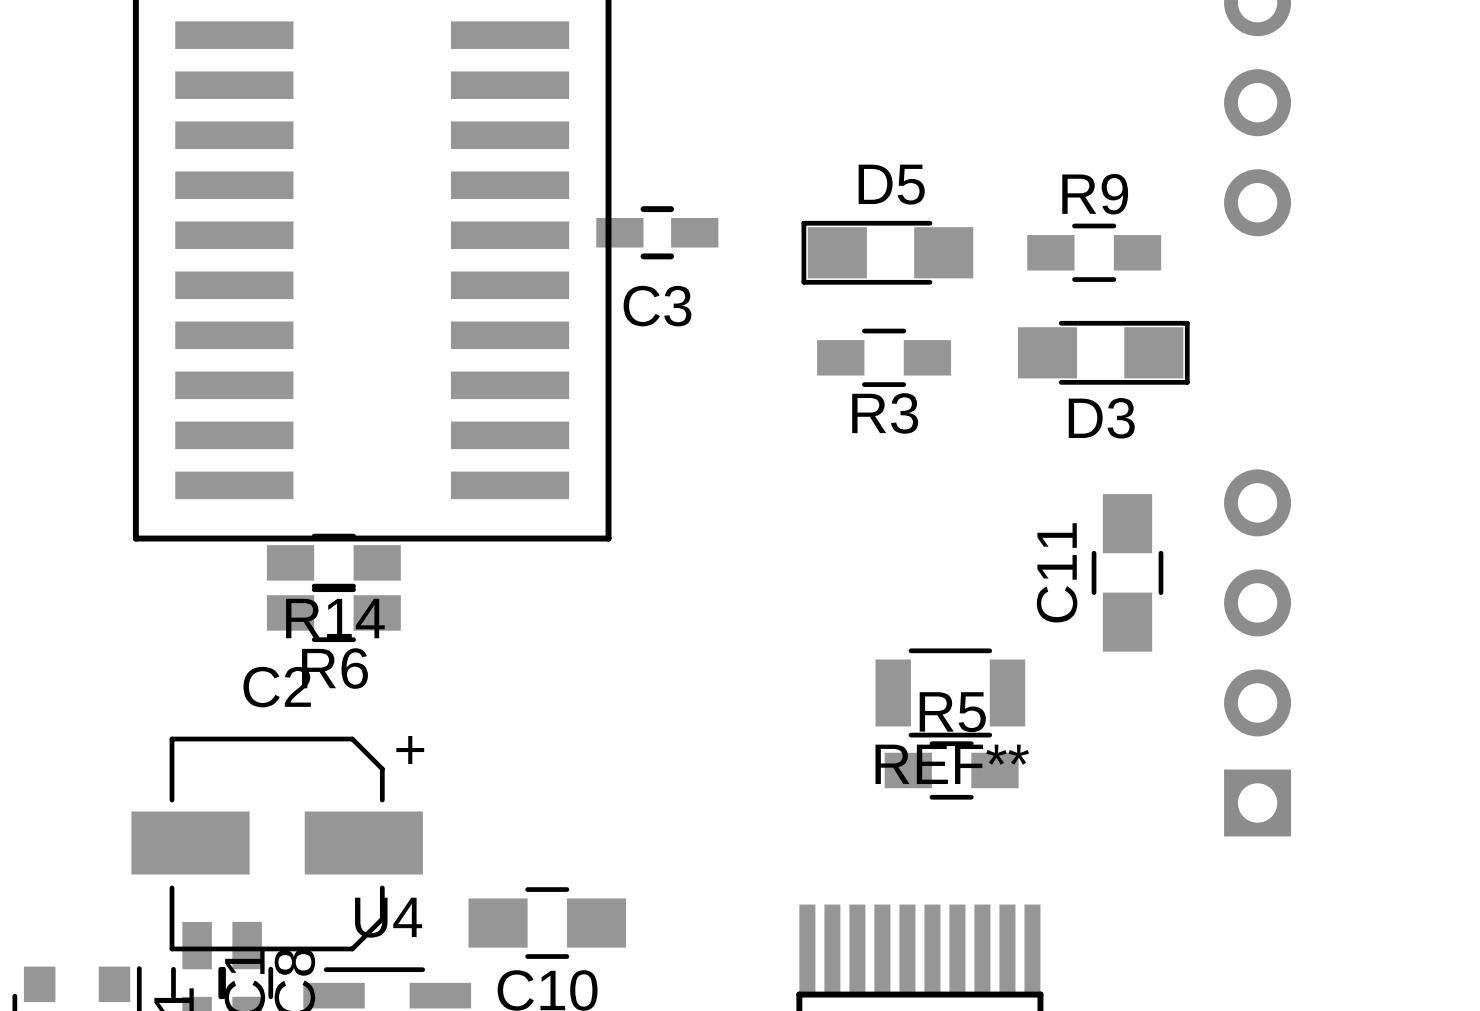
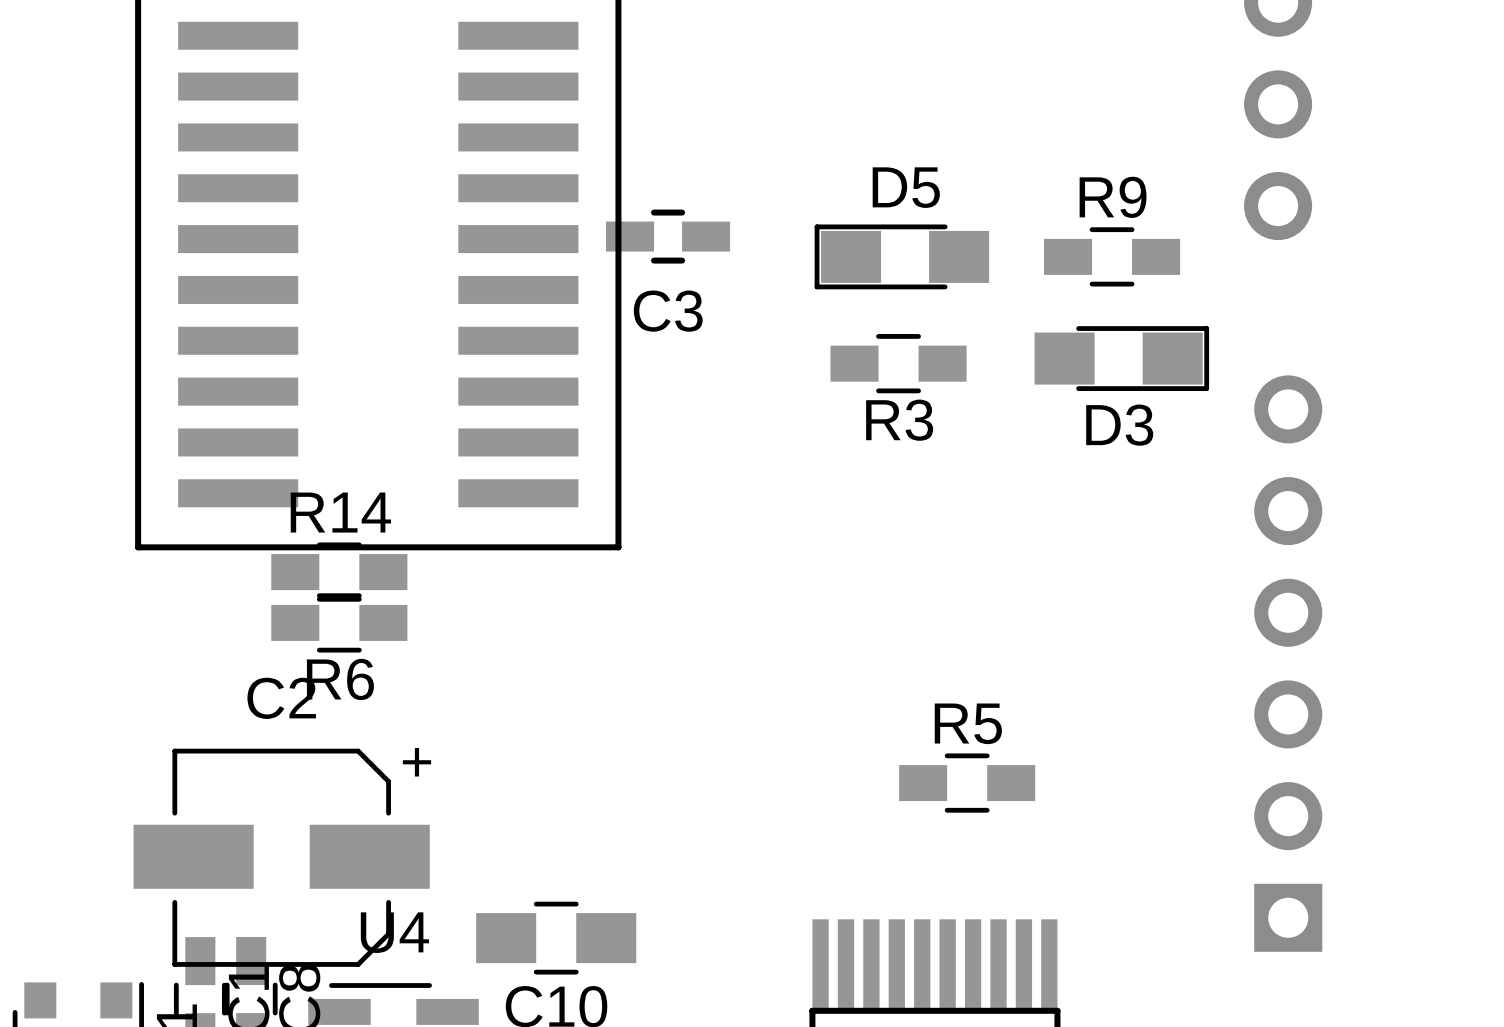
part footprint: [1224, 469, 1292, 837] -> [1254, 375, 1323, 952]
C11: (1127, 572) -> none
R14 name position: R14 (335, 618) -> R14 (340, 512)
REF**: (950, 692) -> none

